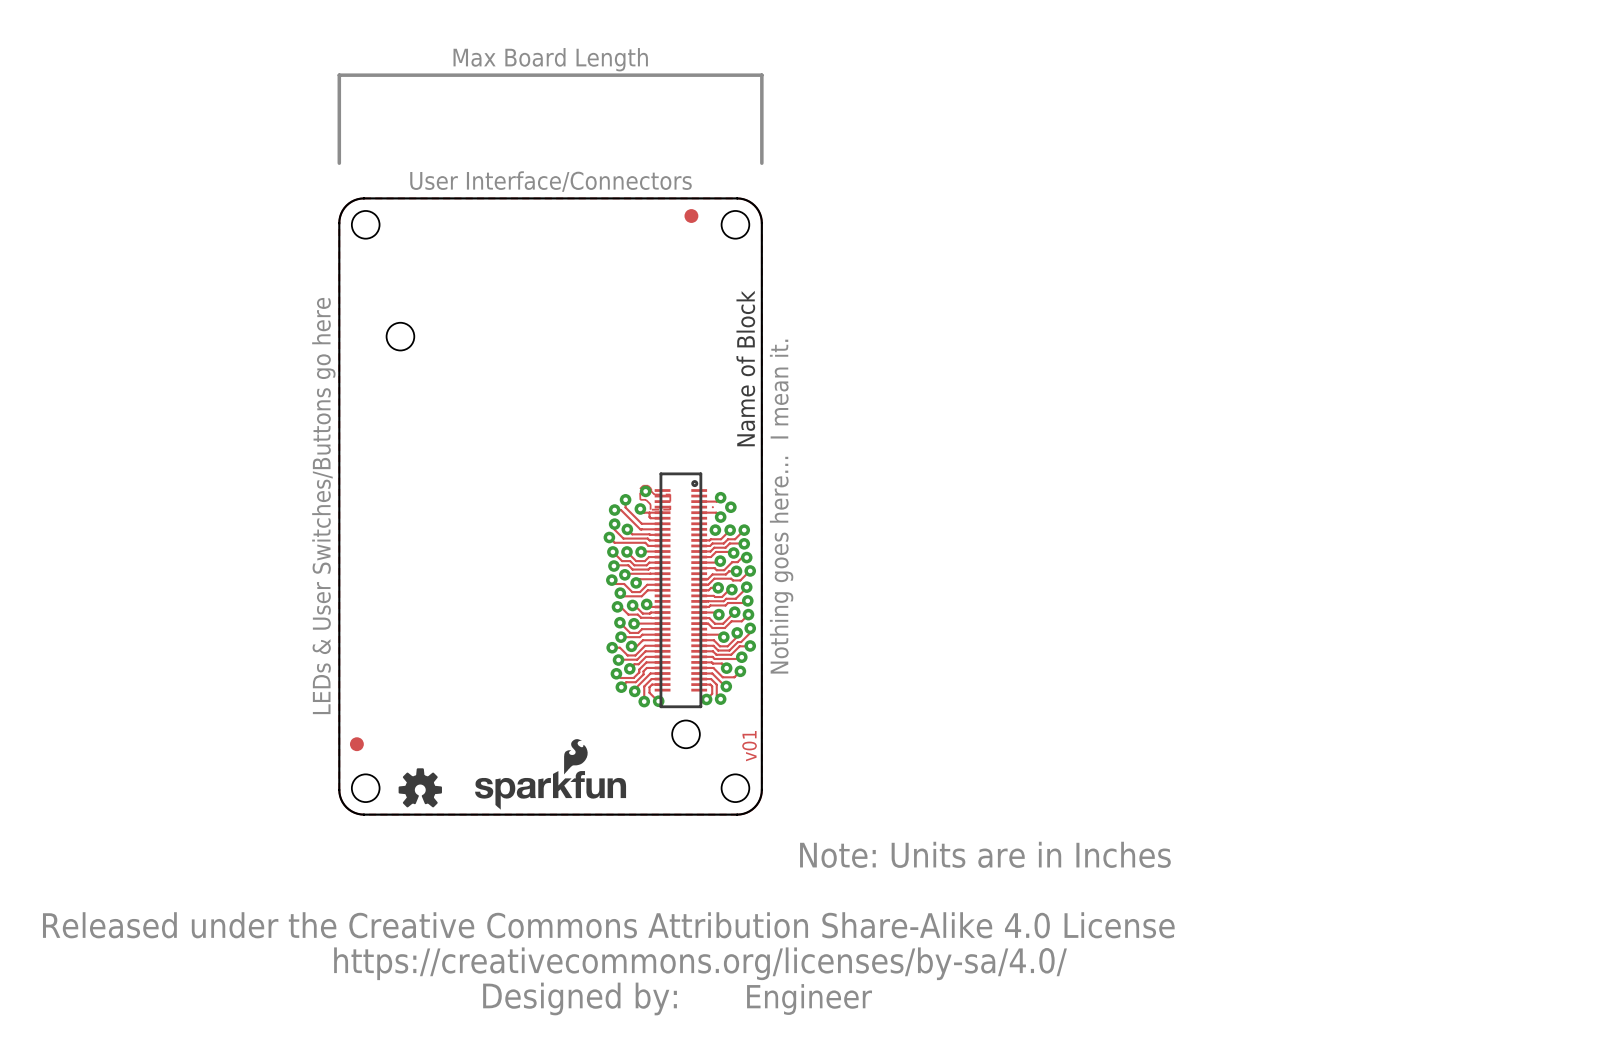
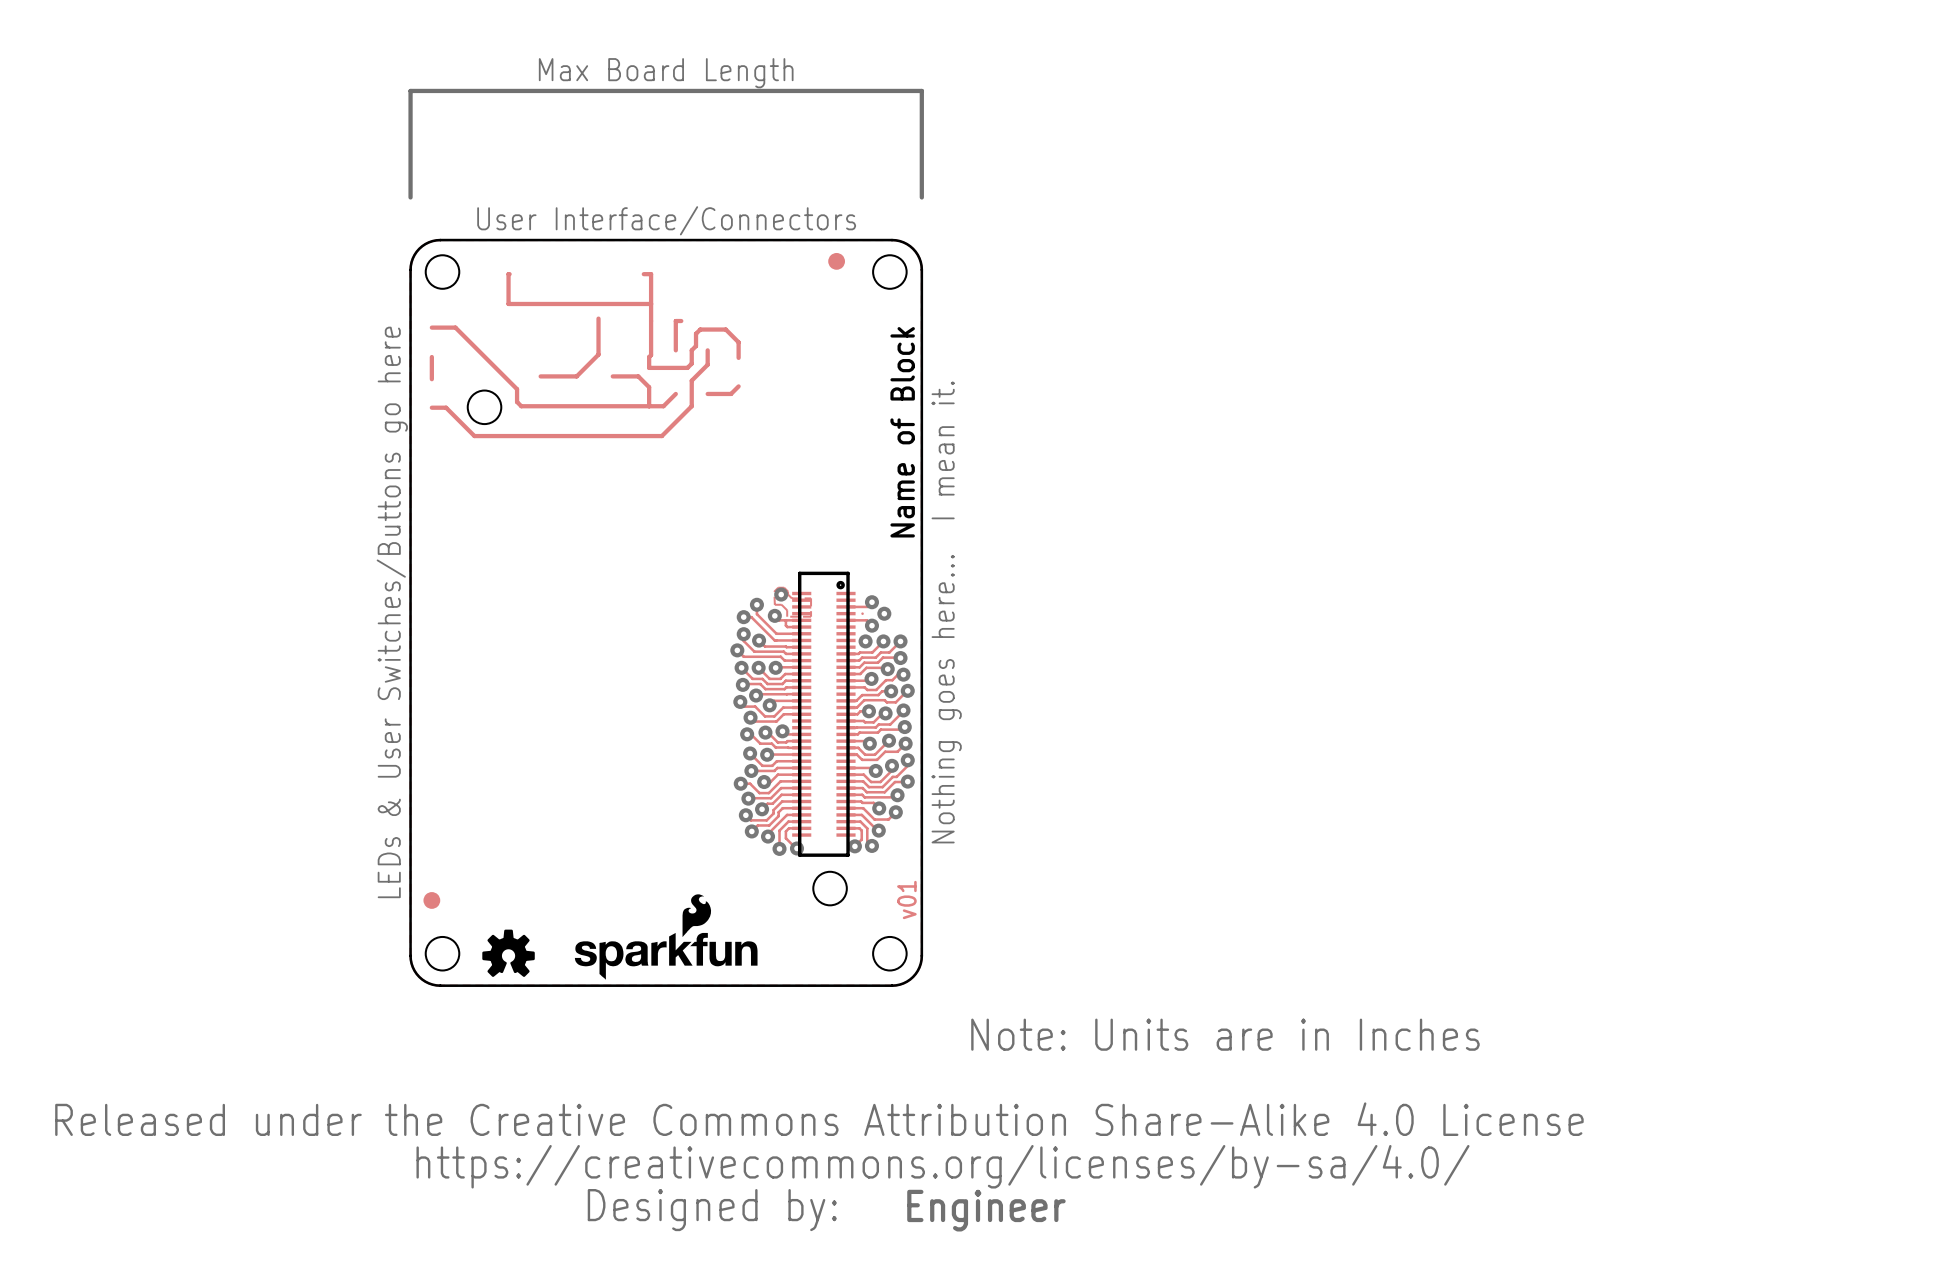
track: none -> (509, 274) (508, 303) (651, 303)
track: none -> (643, 274) (651, 274) (651, 355) (649, 357) (649, 367) (687, 367) (691, 363) (691, 350) (696, 346) (696, 333) (700, 329) (725, 329) (738, 342) (738, 357)
track: none -> (598, 318) (598, 354) (576, 376) (540, 376)
track: none -> (681, 321) (675, 321) (675, 350)
track: none -> (431, 327) (455, 327) (517, 389) (517, 401) (521, 406) (663, 406) (675, 393)
track: none -> (707, 350) (707, 364) (691, 380) (691, 406) (661, 436) (474, 436) (446, 407) (431, 407)
track: none -> (431, 357) (431, 379)
track: none -> (612, 376) (638, 376) (649, 387) (649, 406)
track: none -> (738, 386) (731, 393) (707, 393)

